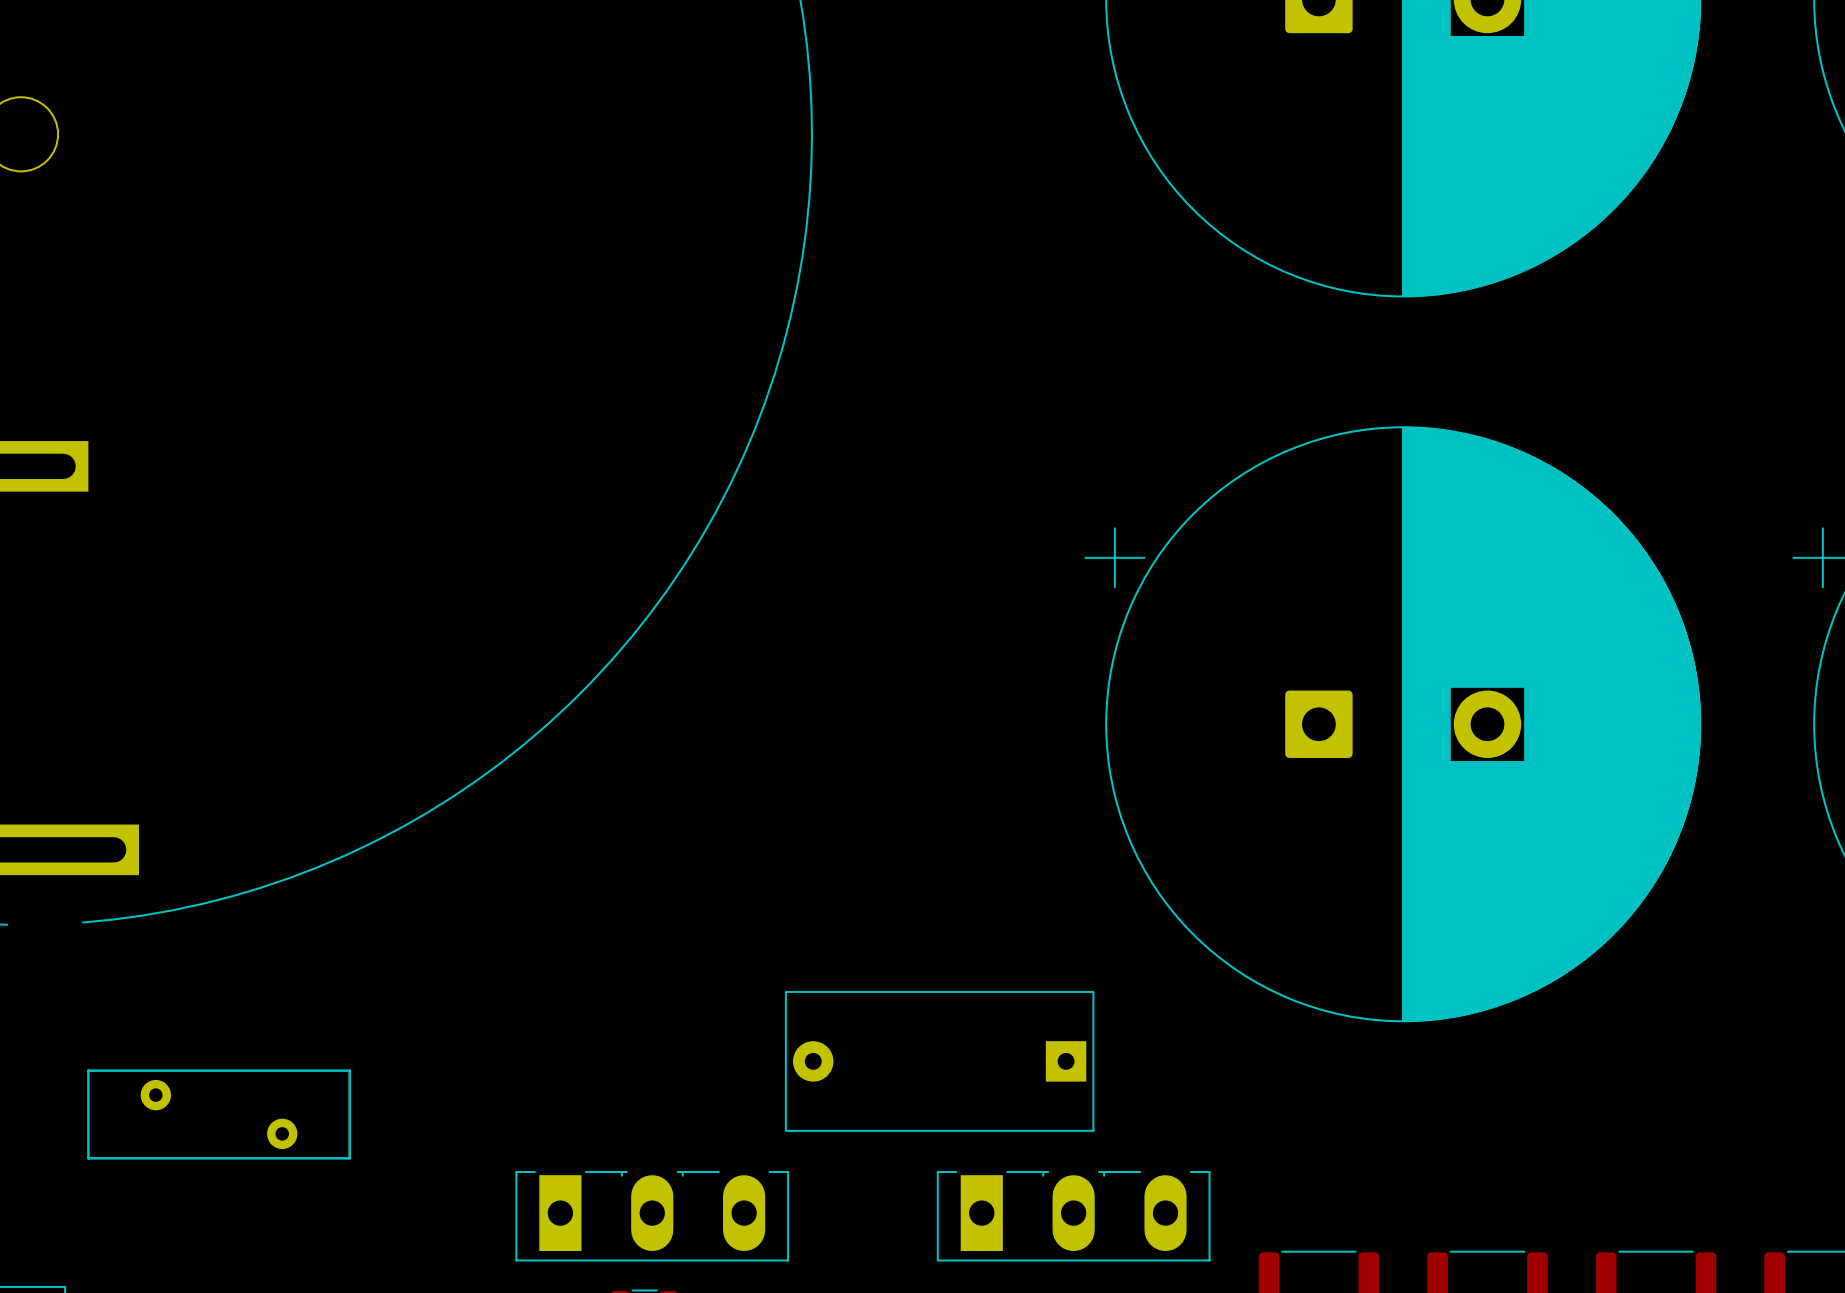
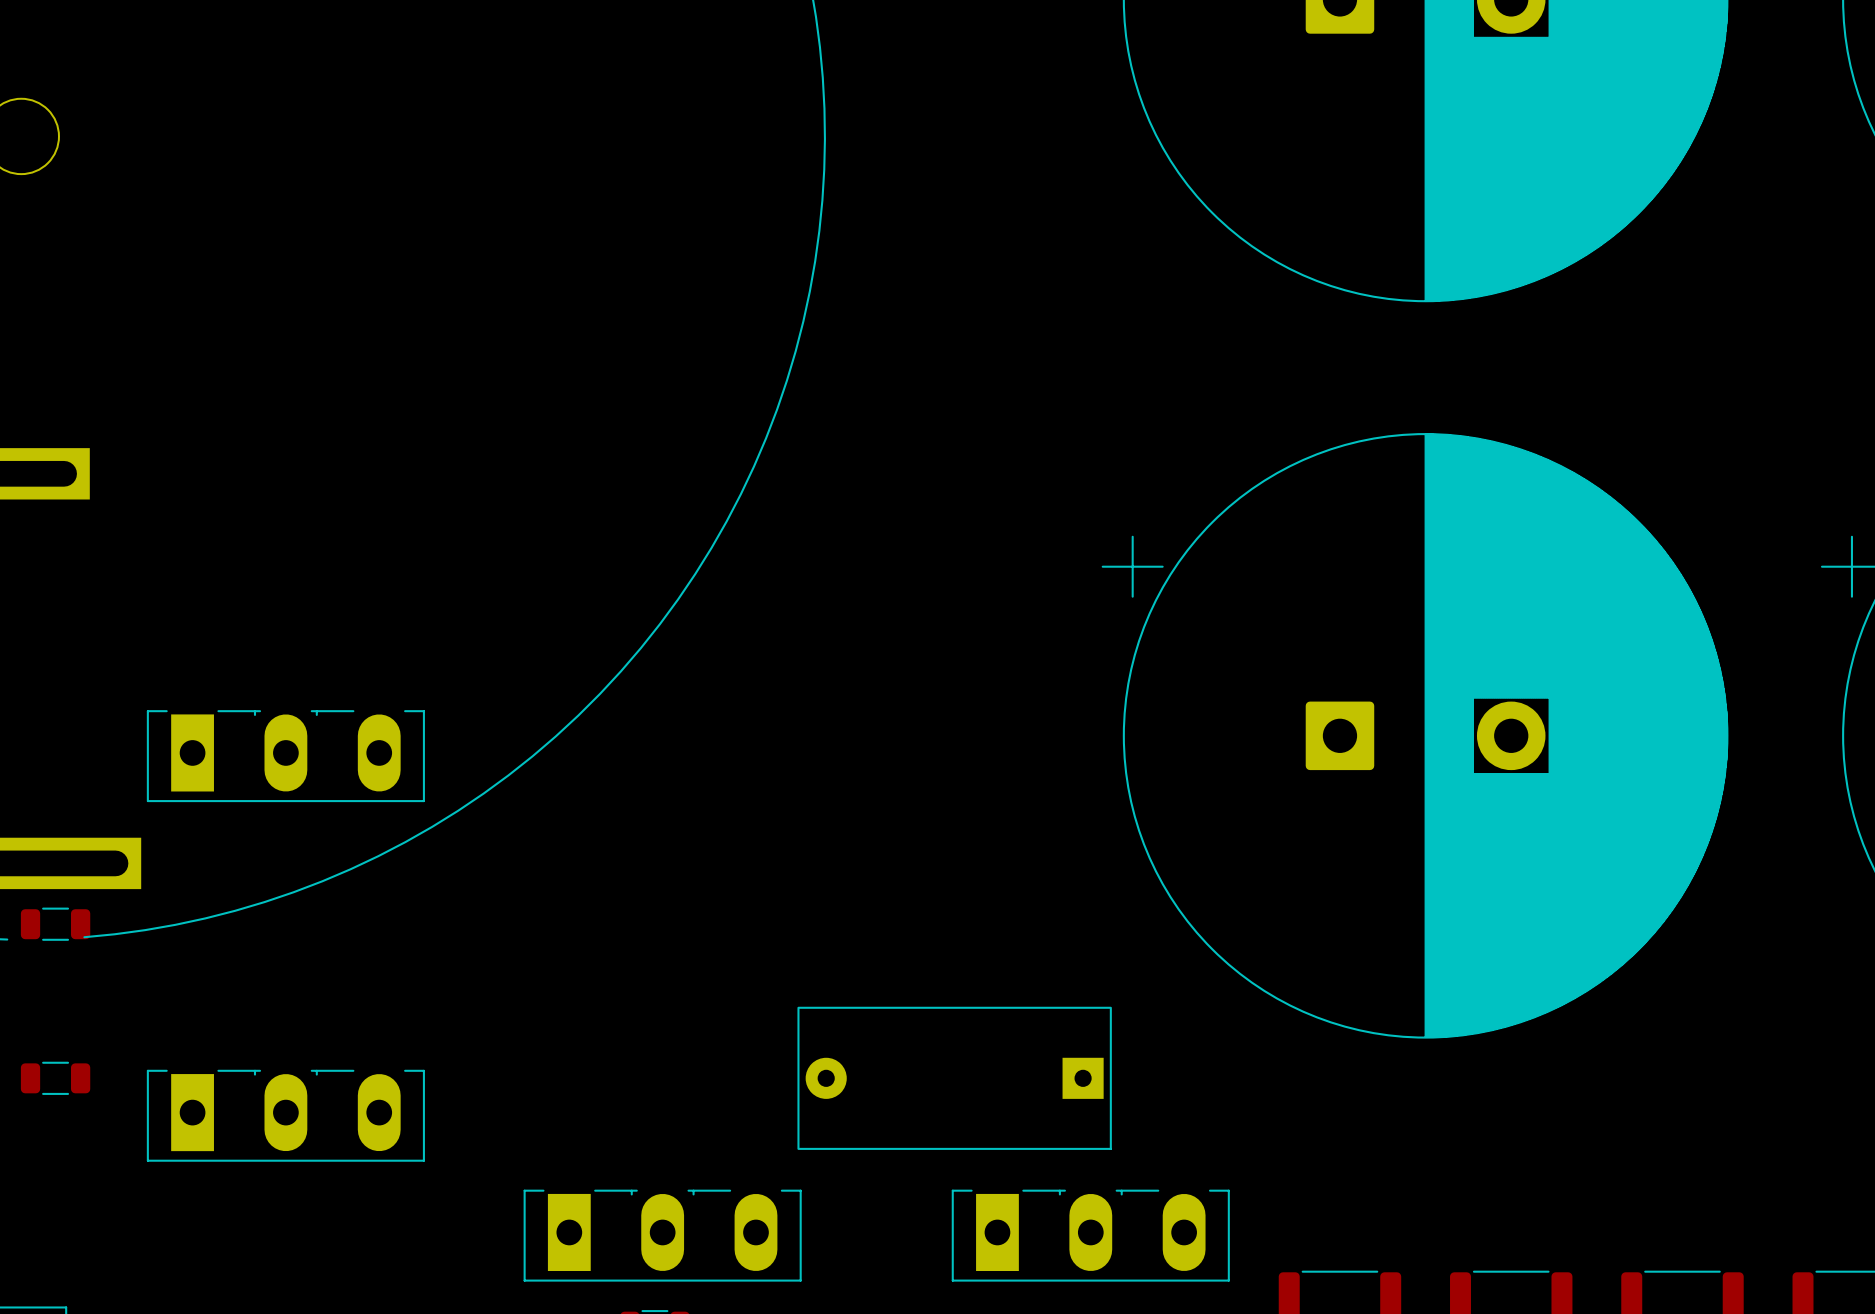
part: none -> (285, 756)
part: none -> (55, 924)
part: none -> (55, 1078)
part: none -> (285, 1115)
part: (219, 1114) -> none

